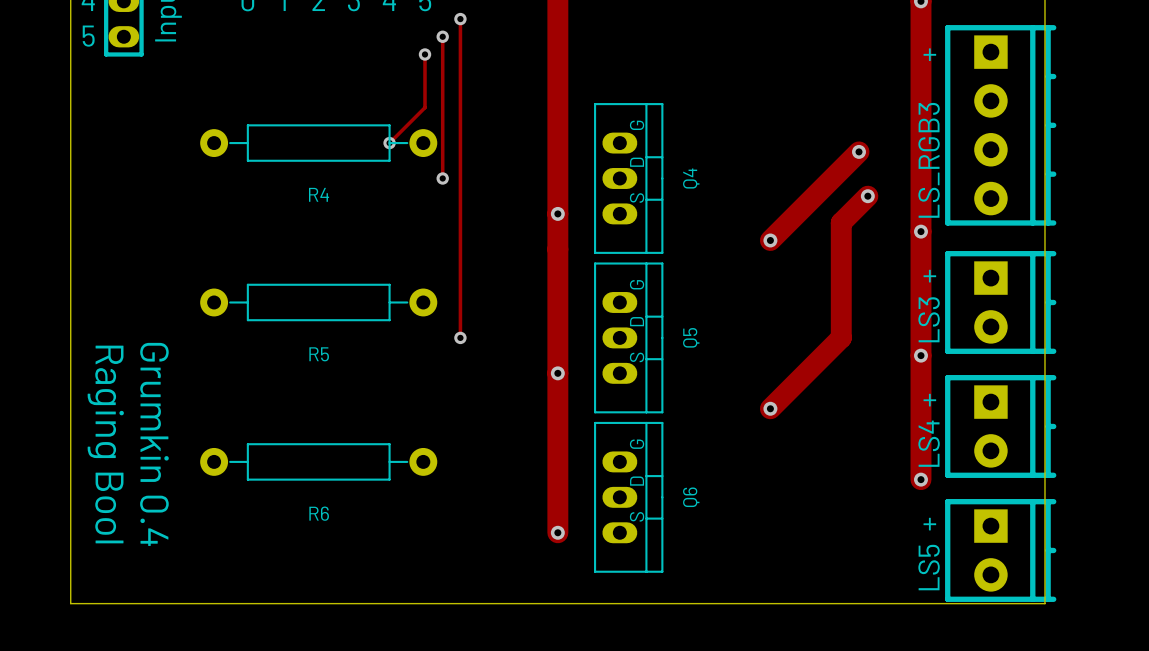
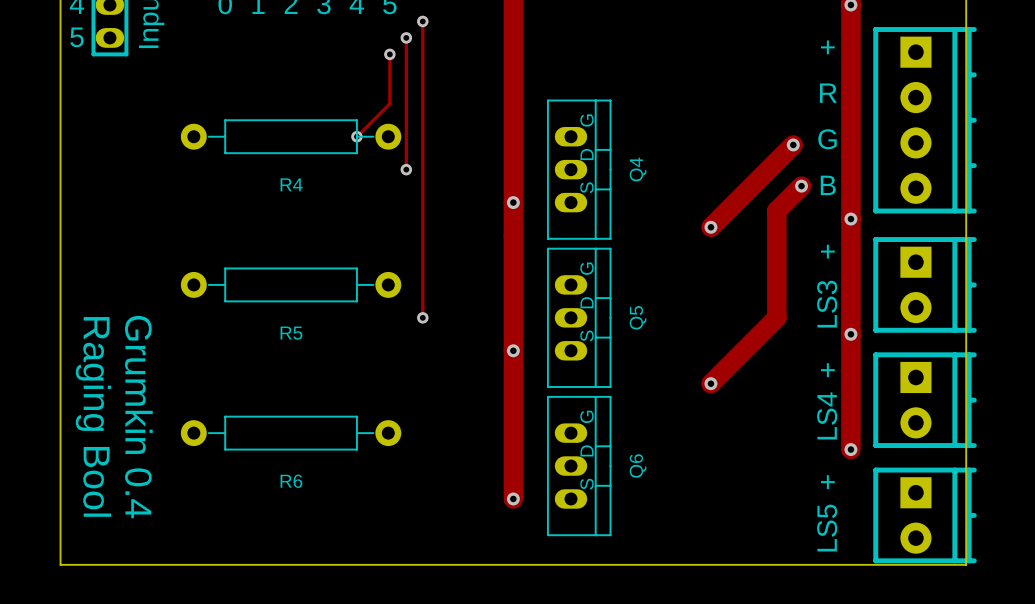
text position: + (929, 54) -> + (827, 47)
text: none -> R (828, 93)
text: none -> G (827, 139)
part value: LS_RGB3 (929, 160) -> none
text: none -> B (828, 185)
text position: + (929, 276) -> + (827, 251)
part value position: LS3 (929, 319) -> LS3 (827, 304)
text position: + (929, 400) -> + (827, 370)
part value position: LS4 (929, 443) -> LS4 (827, 415)
text position: + (929, 524) -> + (827, 482)
part value position: LS5 (929, 567) -> LS5 (827, 528)

